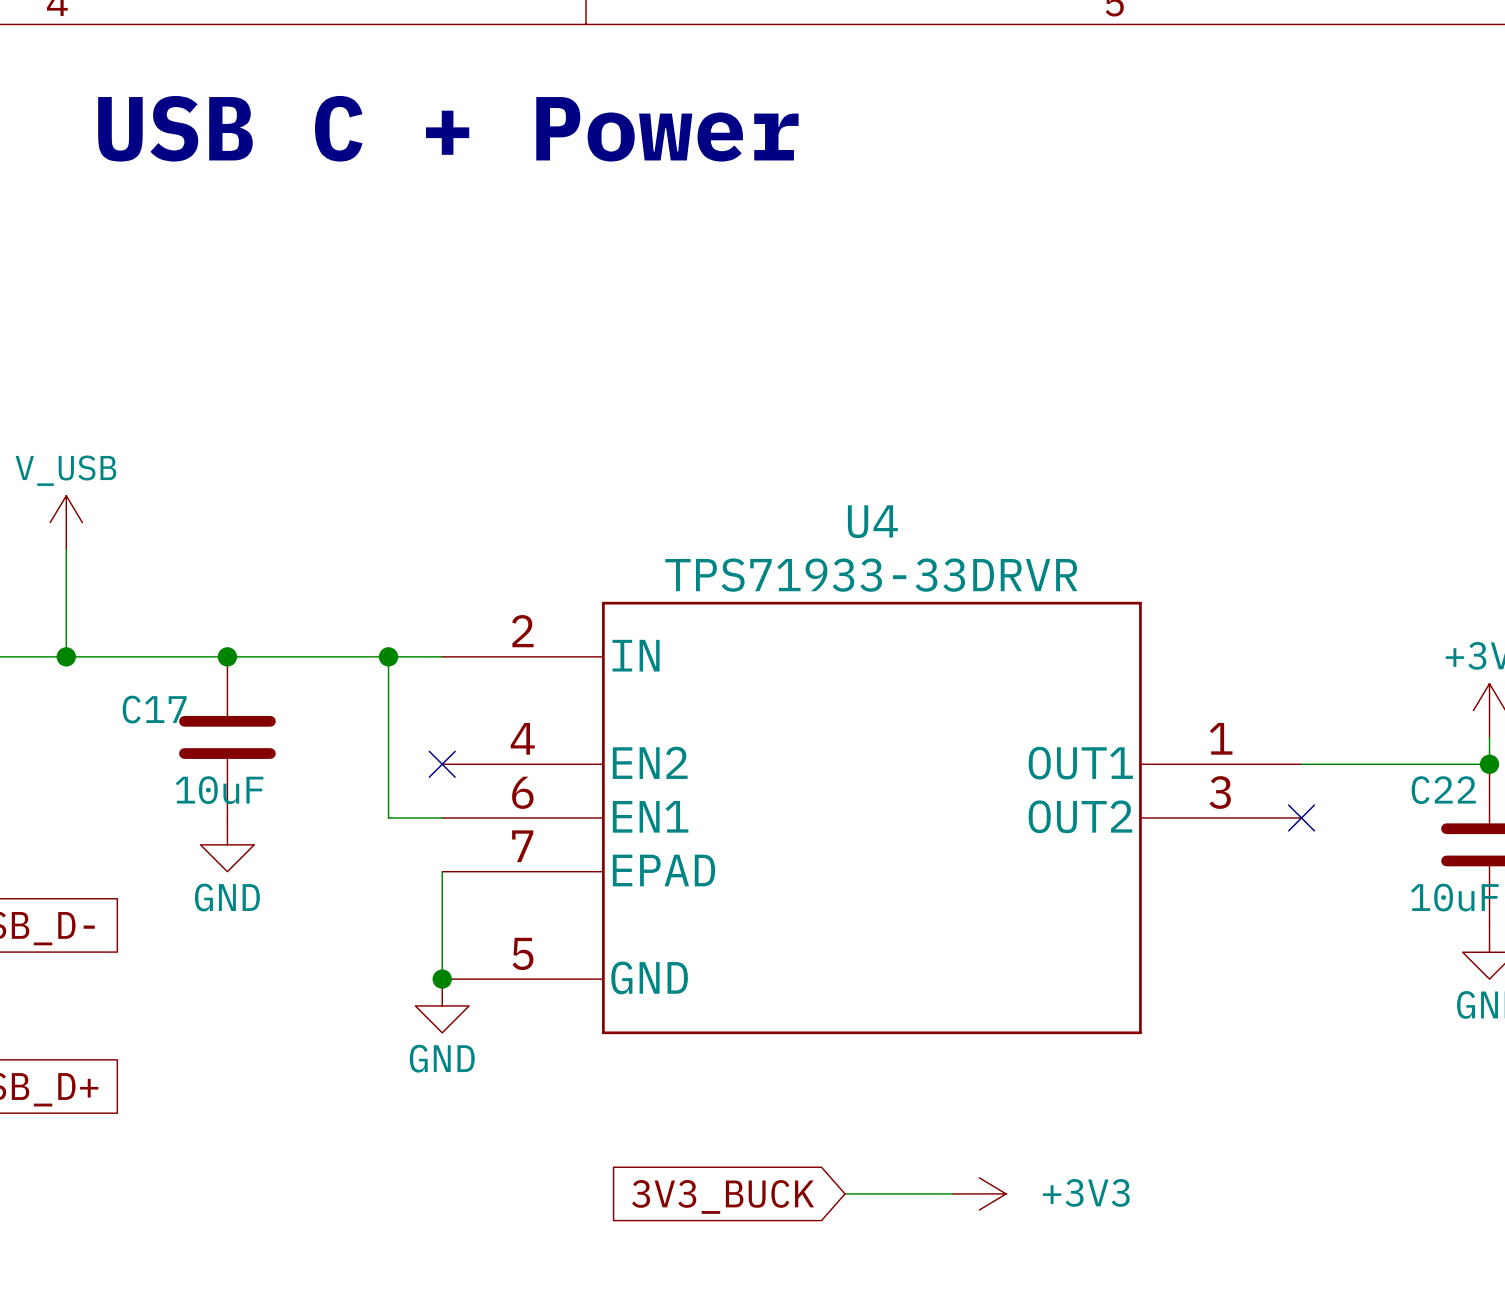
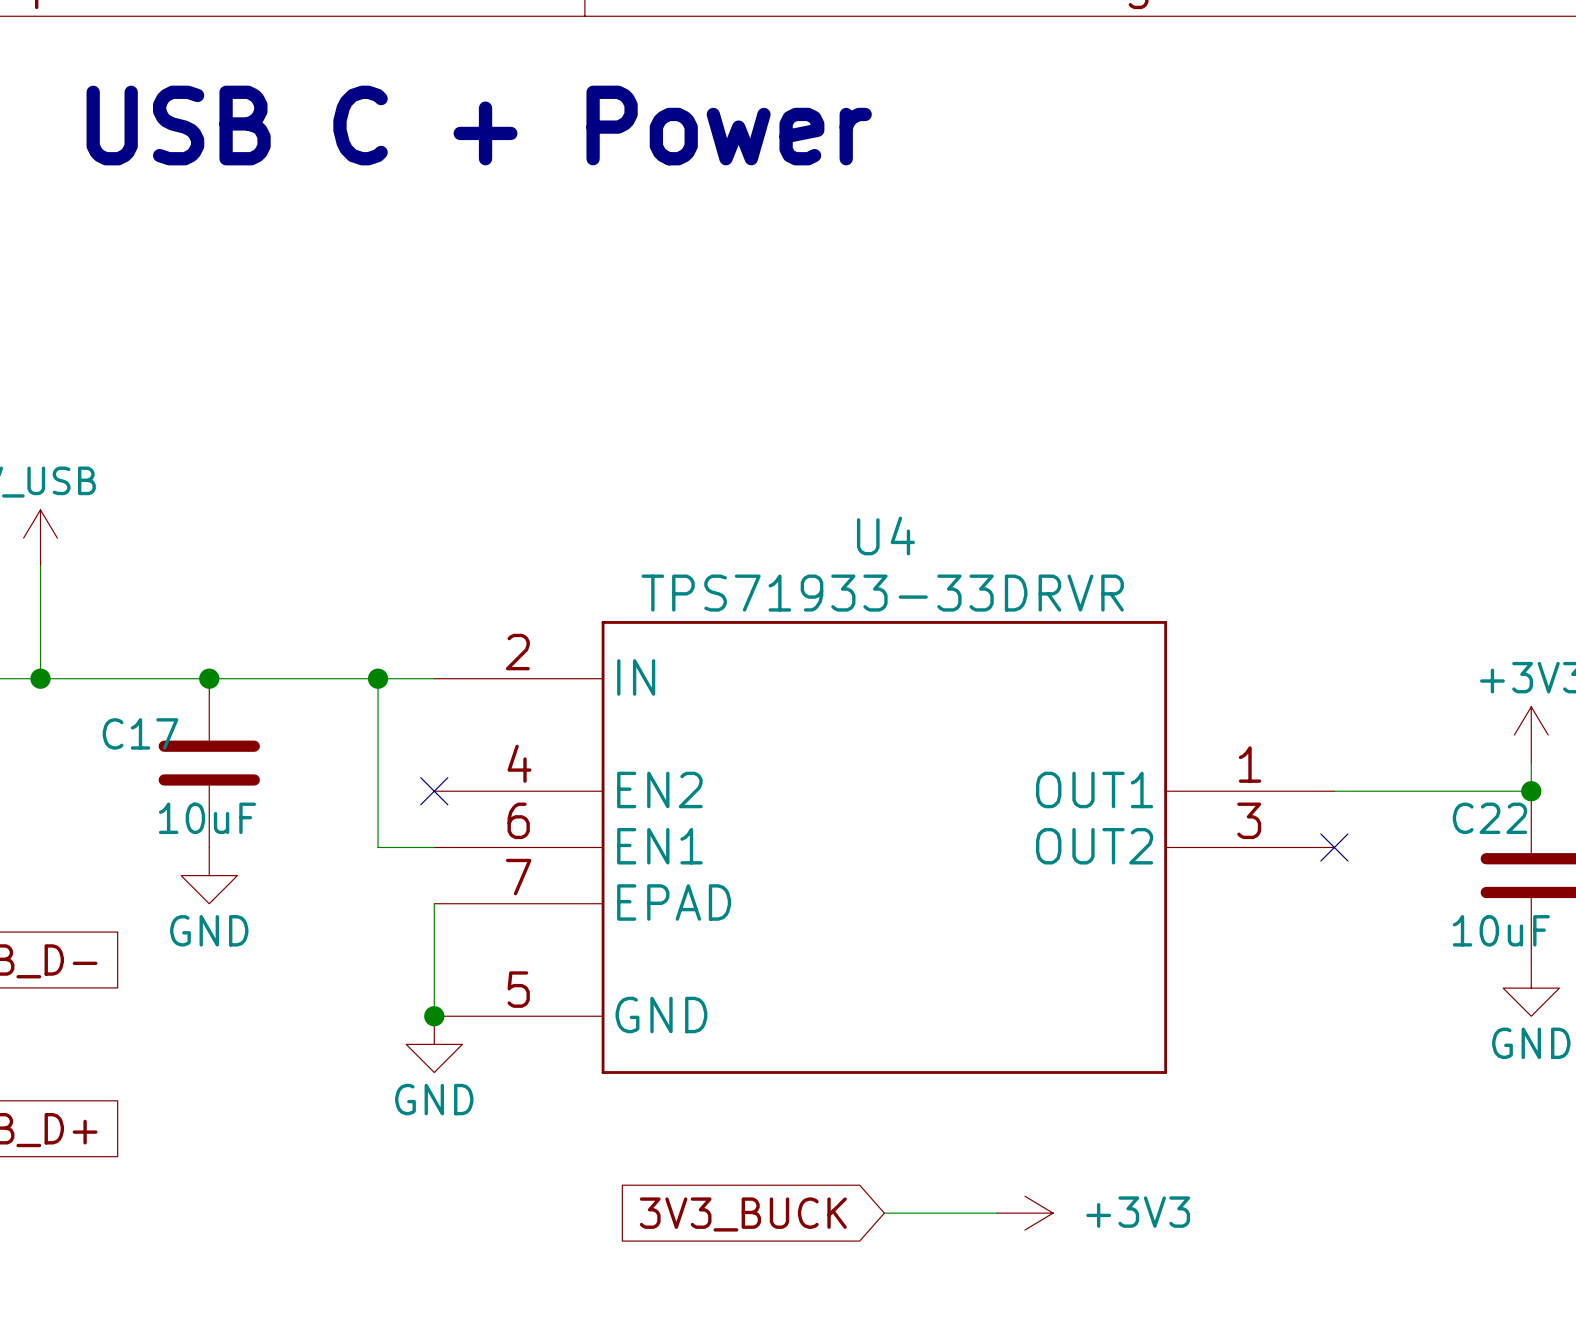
wire: (845, 1193) (952, 1193) -> (884, 1213) (996, 1213)
power symbol position: +3V3 (979, 1193) -> +3V3 (1024, 1213)
global label position: 3V3_BUCK (723, 1196) -> 3V3_BUCK (743, 1214)

